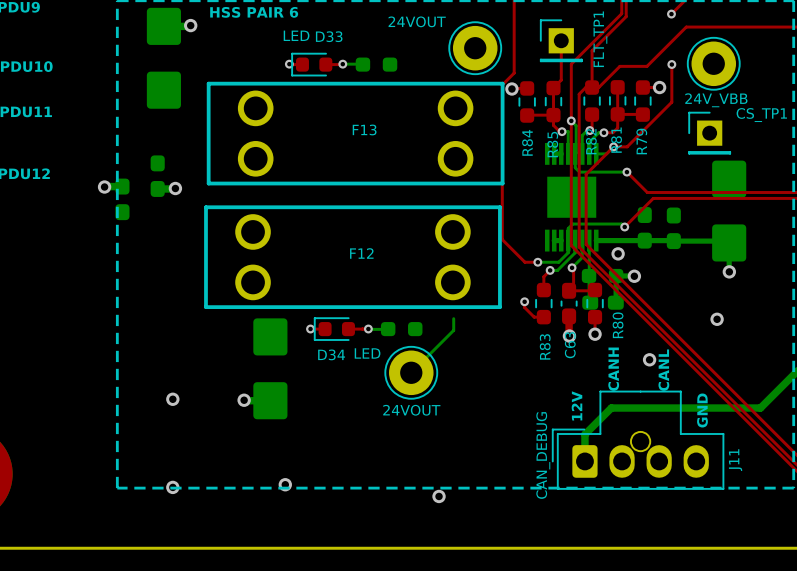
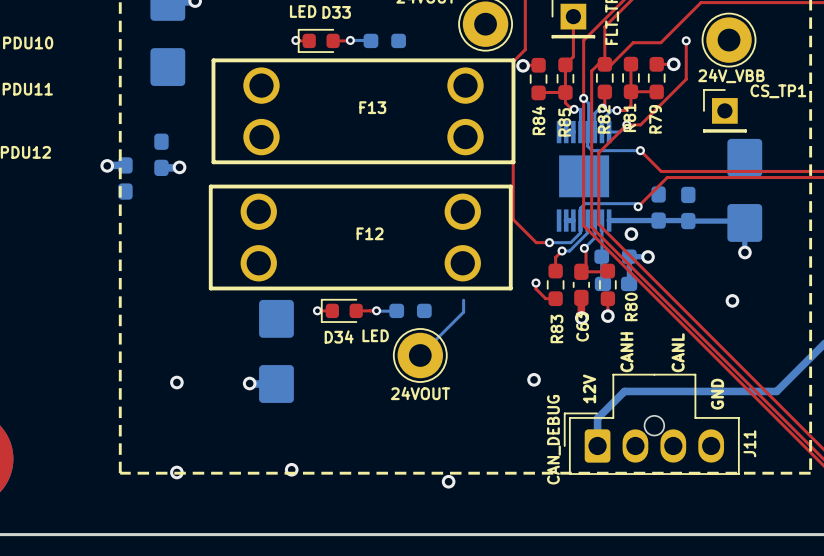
via: (649, 359) -> none
via: none -> (534, 379)

